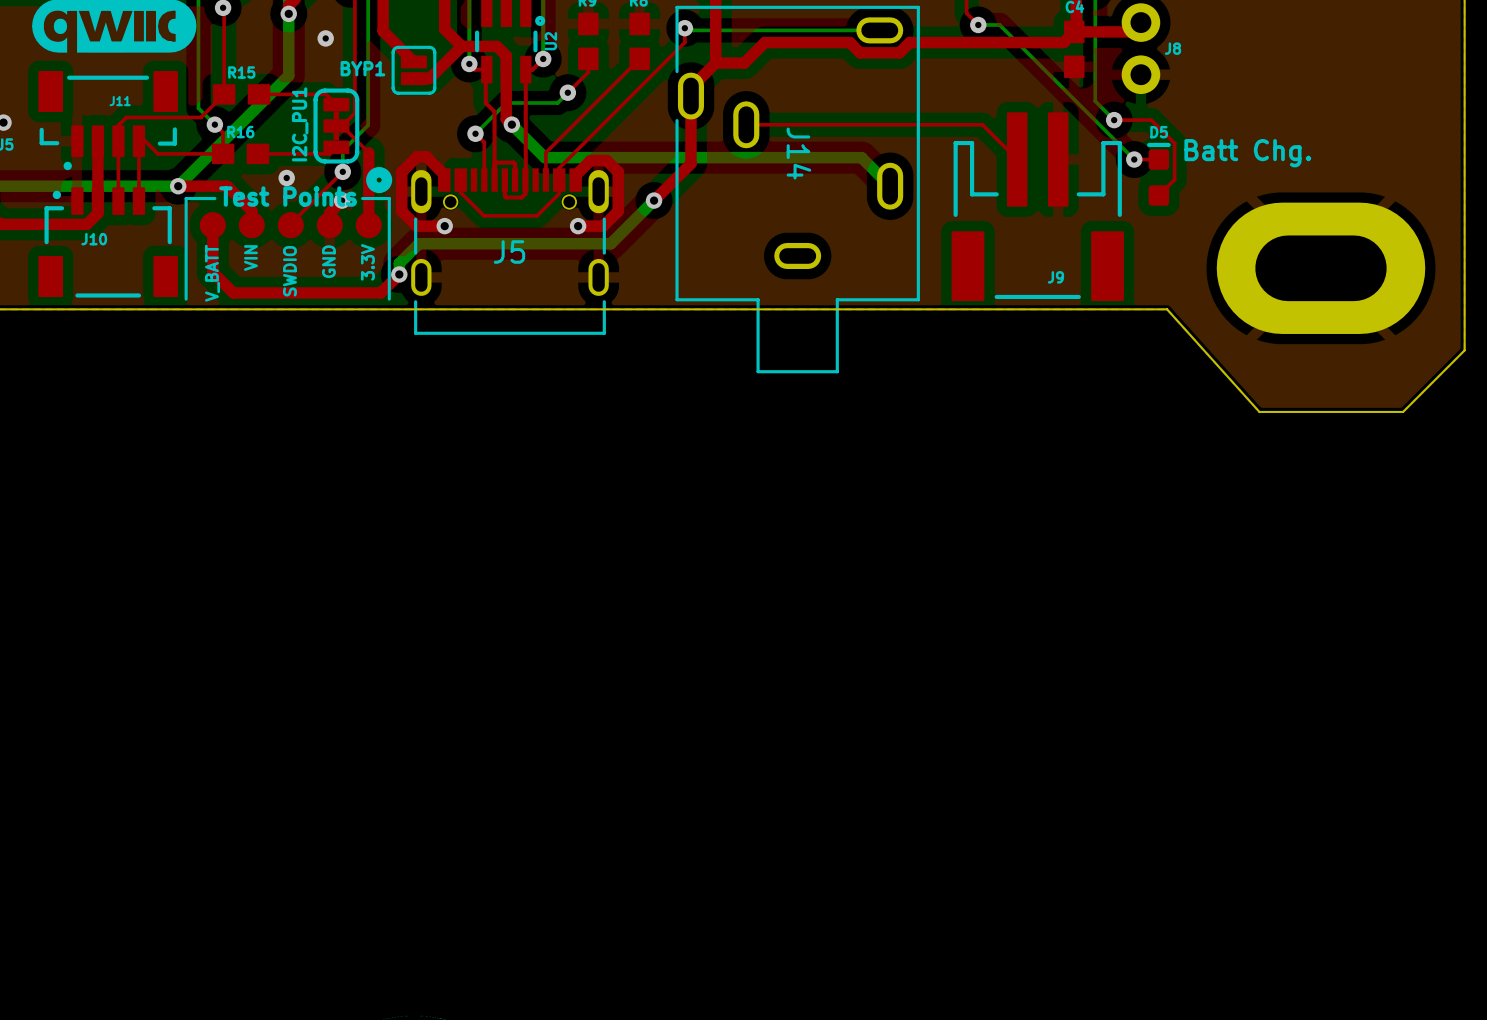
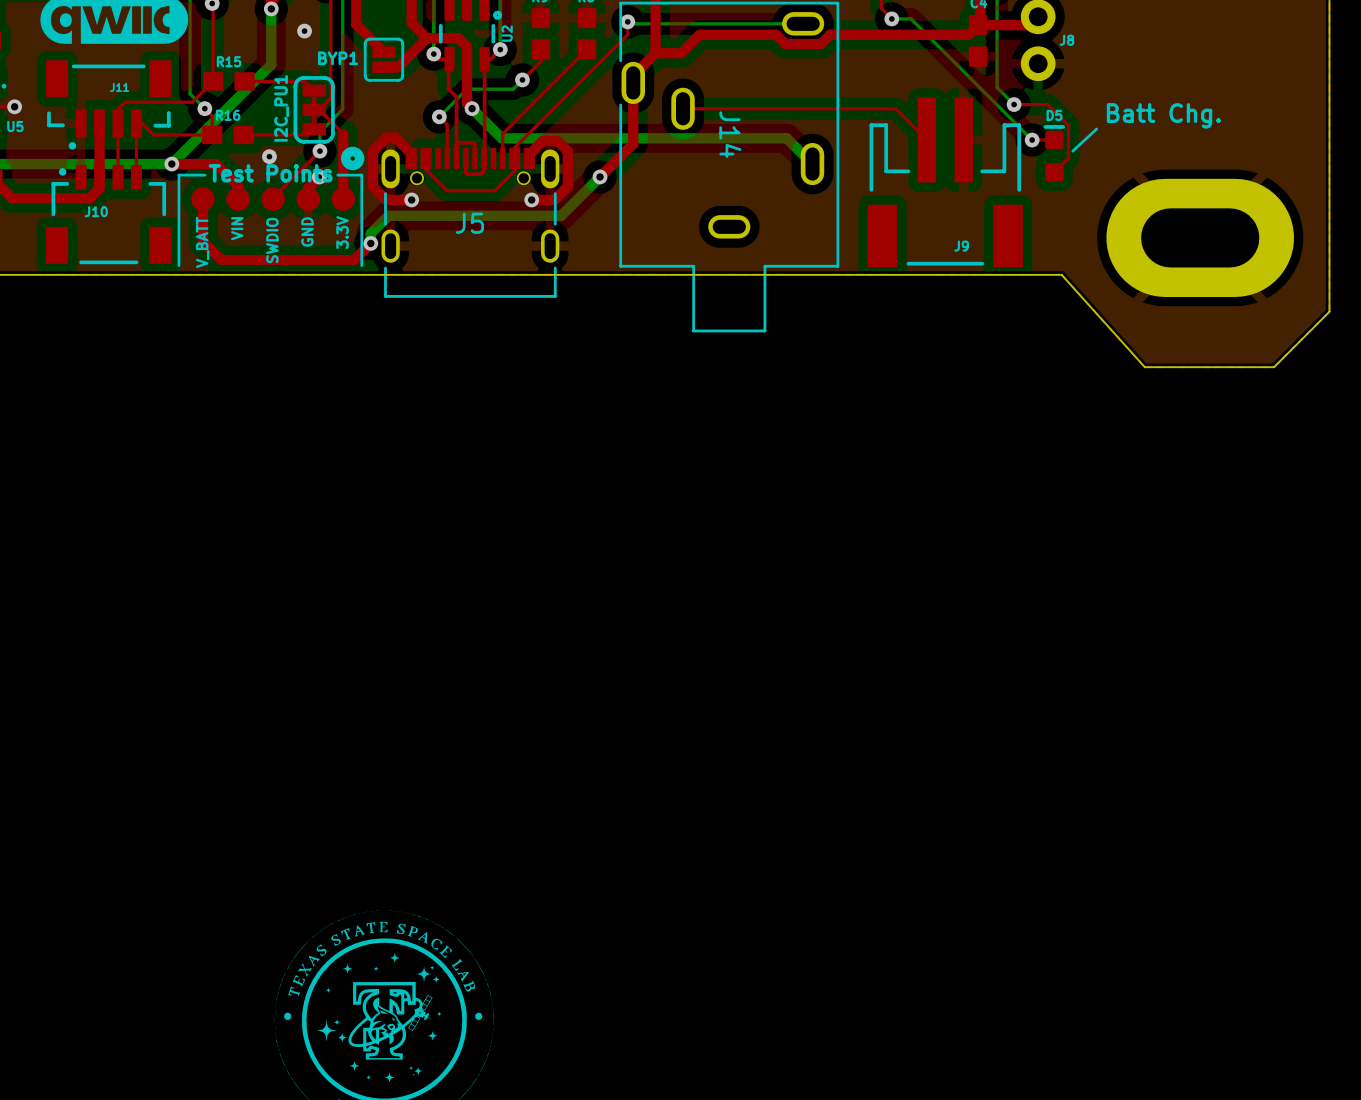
line: none -> (1096, 128) (1072, 151)
text position: Batt Chg. (1247, 153) -> Batt Chg. (1163, 115)

